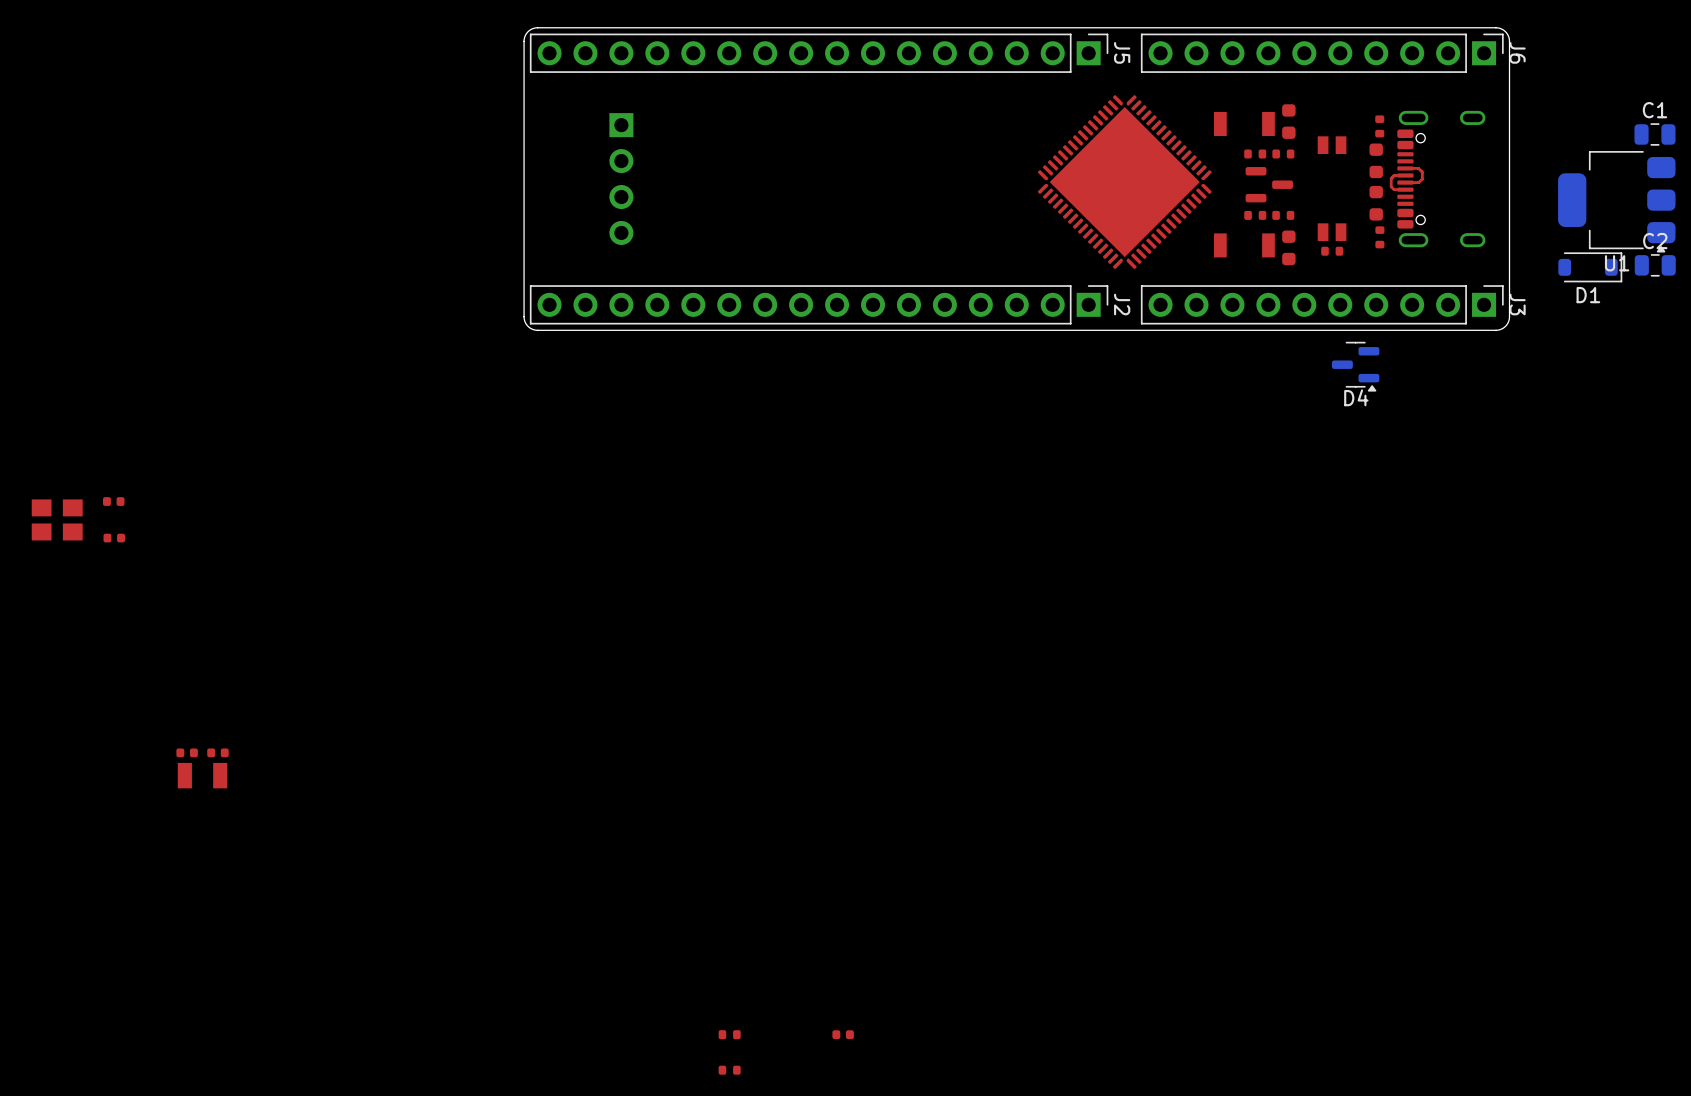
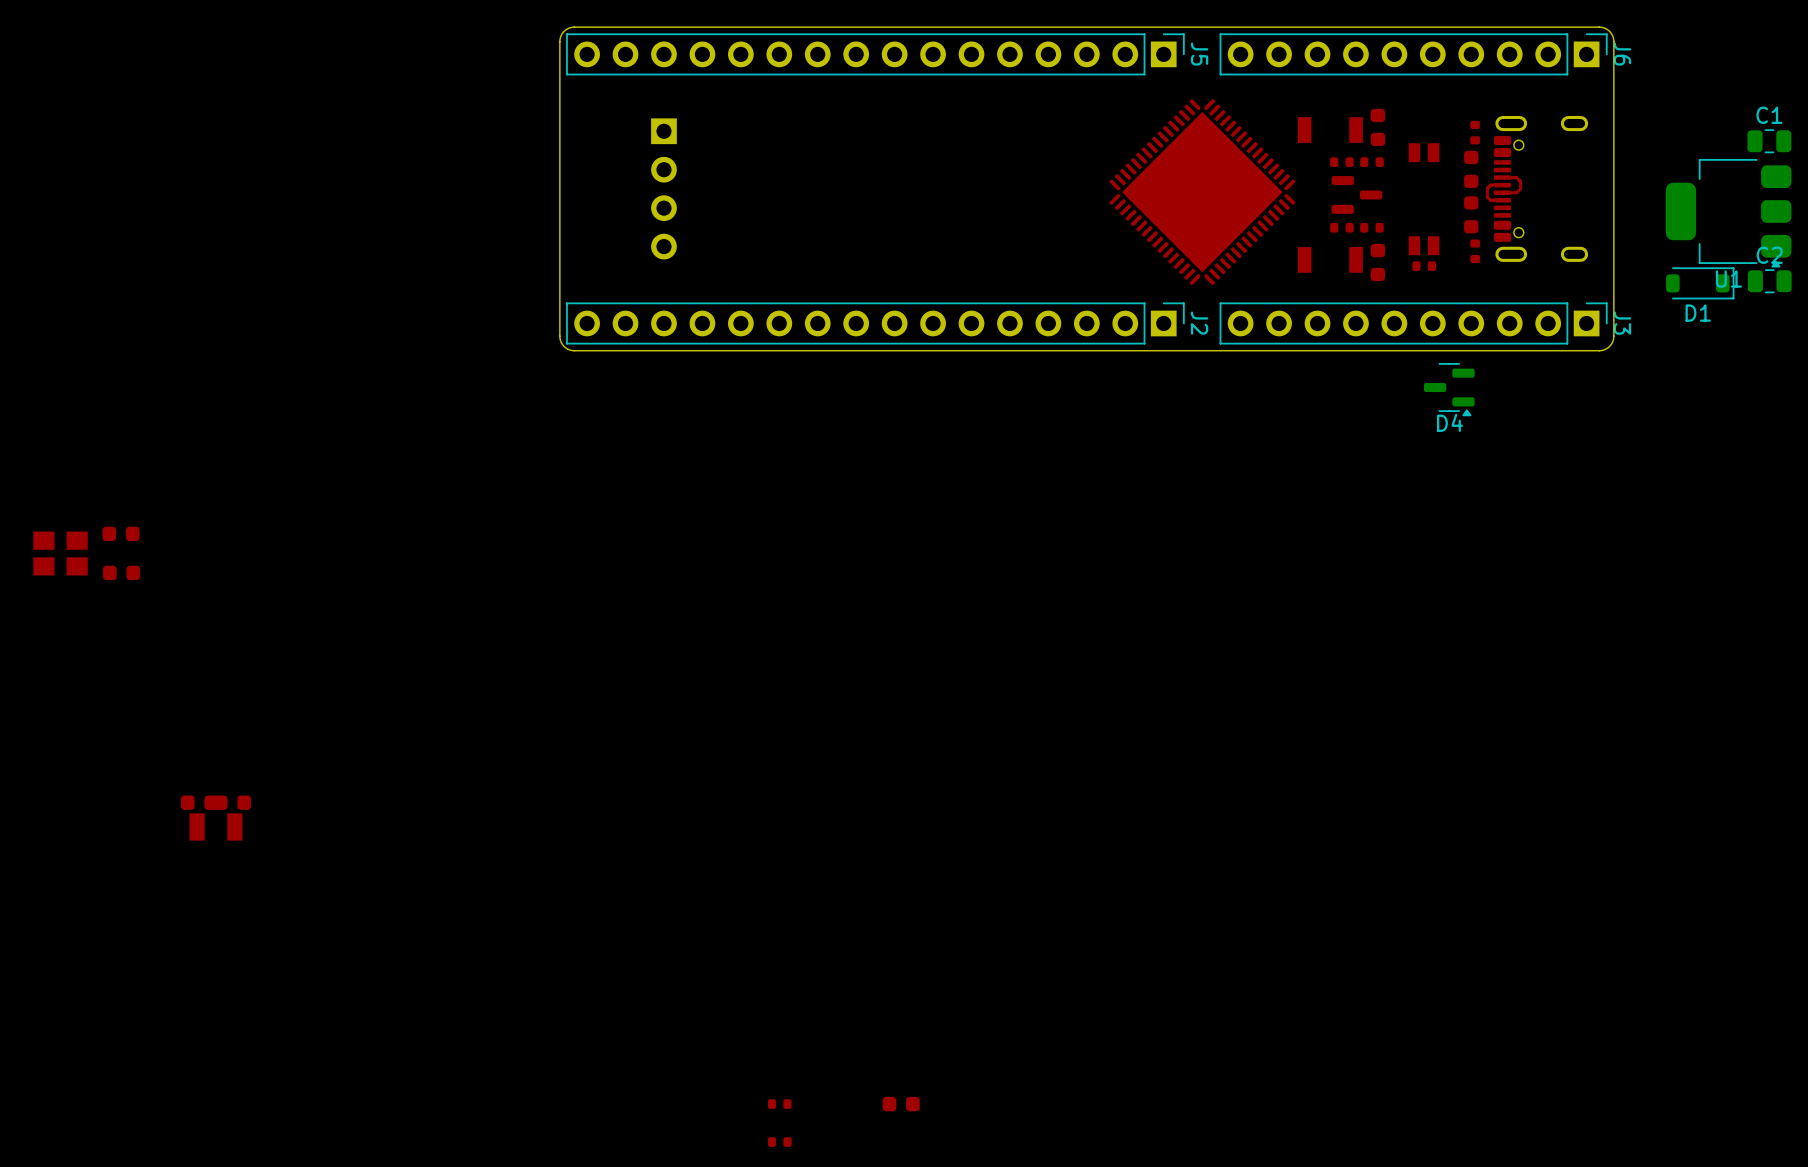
part footprint: [102, 497, 125, 506] -> [102, 526, 140, 542]
part footprint: [103, 533, 126, 543] -> [103, 565, 141, 581]
part footprint: [176, 748, 198, 758] -> [180, 795, 219, 810]
part footprint: [207, 748, 229, 758] -> [213, 795, 252, 810]
part footprint: [832, 1030, 854, 1040] -> [882, 1096, 920, 1112]

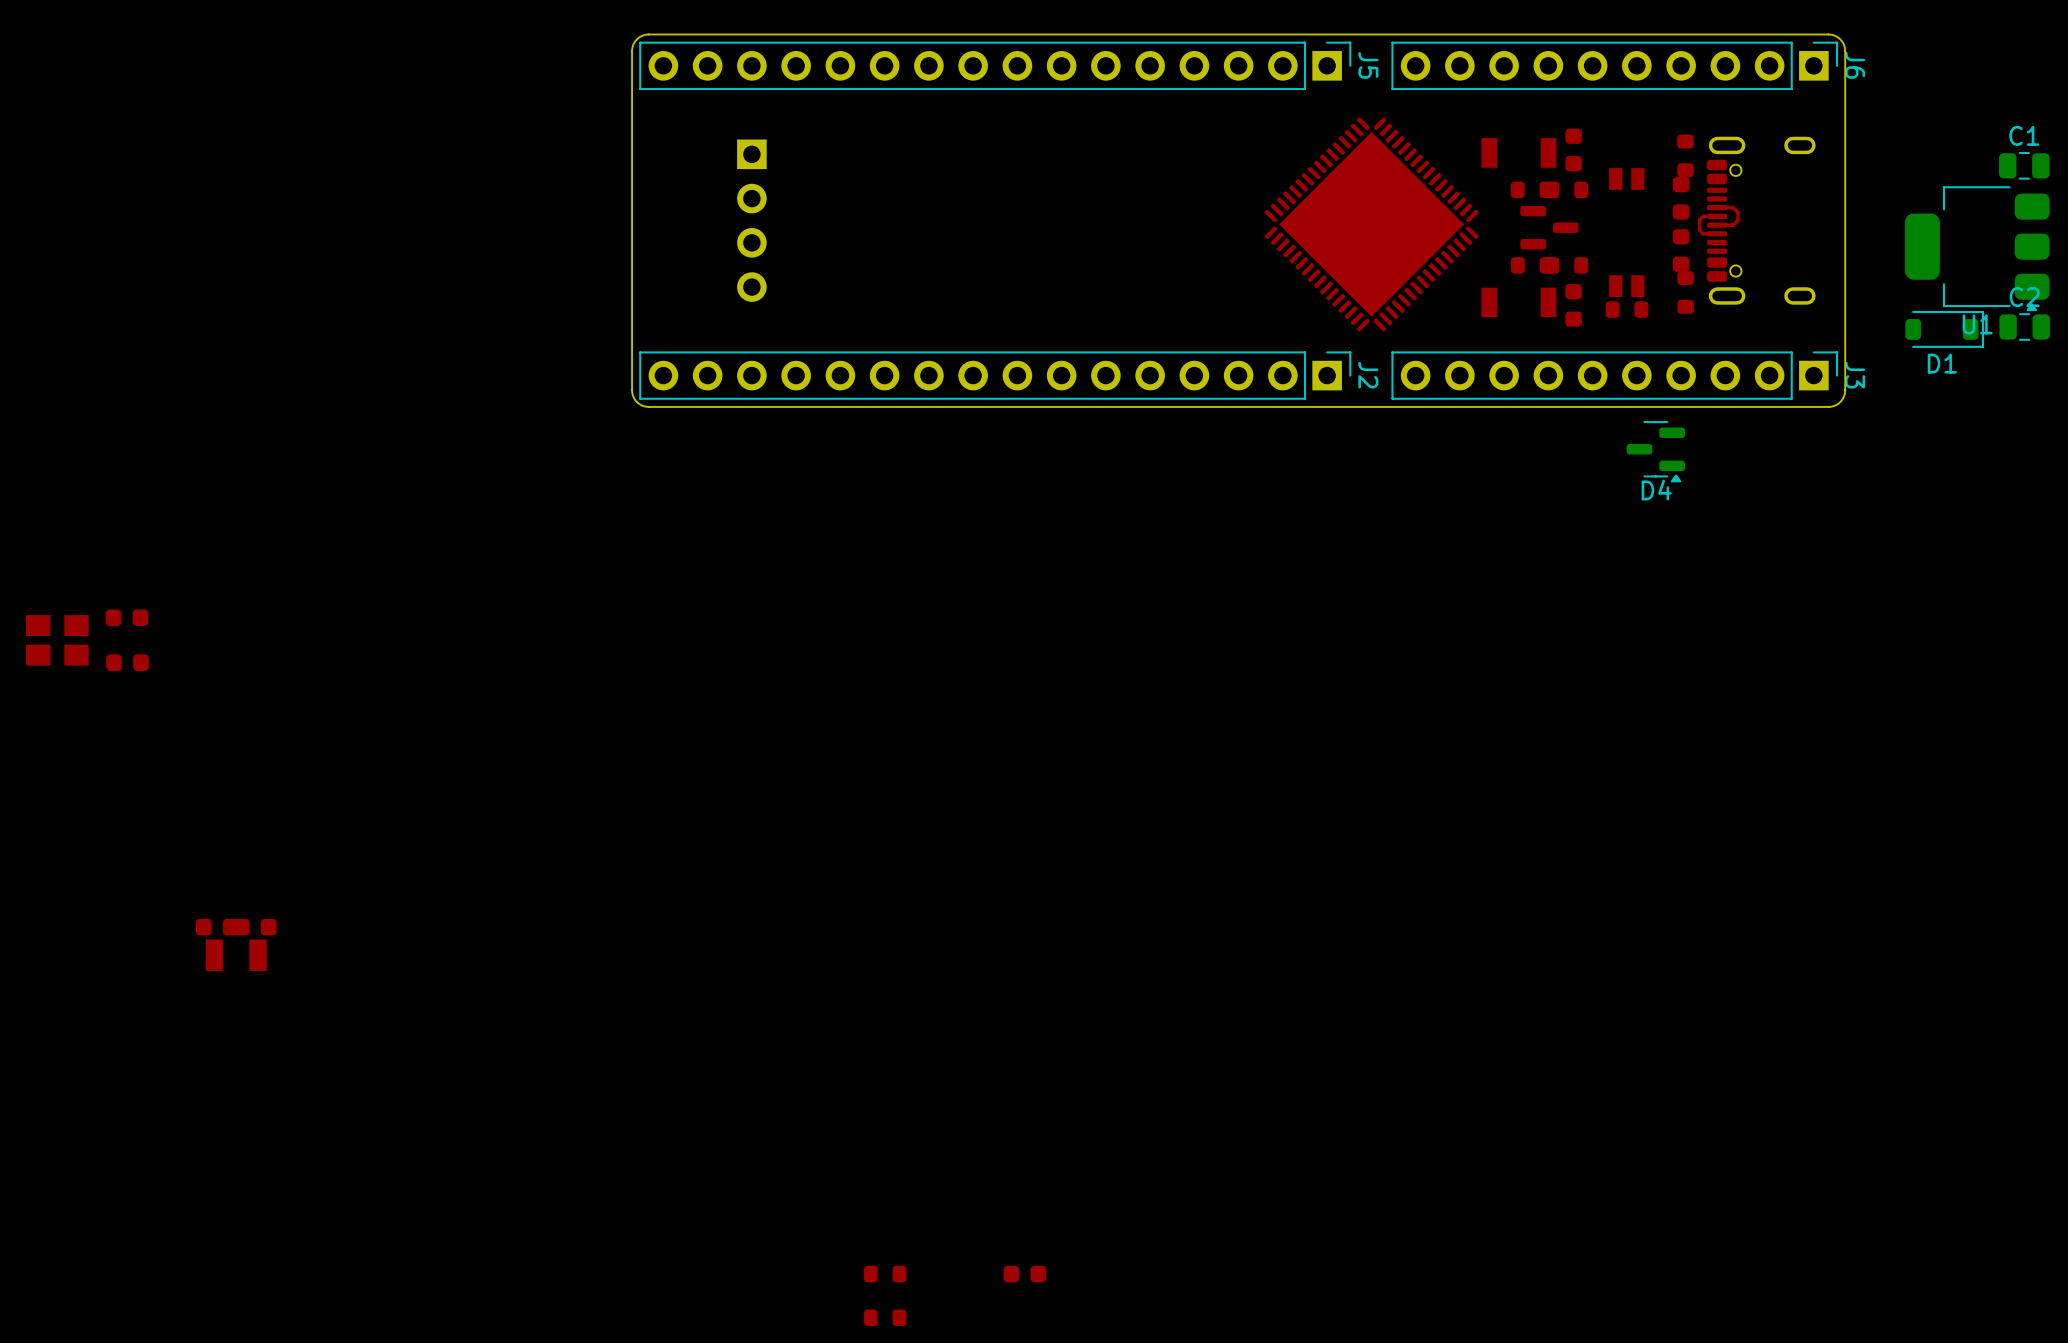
part footprint: [1470, 120, 1480, 145] -> [1677, 134, 1694, 178]
part footprint: [1330, 157, 1354, 167] -> [1510, 181, 1554, 199]
part footprint: [1360, 157, 1384, 167] -> [1545, 181, 1589, 199]
part footprint: [1330, 222, 1354, 233] -> [1510, 257, 1554, 274]
part footprint: [1360, 222, 1384, 233] -> [1545, 257, 1589, 274]
part footprint: [1470, 239, 1481, 264] -> [1677, 271, 1694, 314]
part footprint: [1412, 261, 1437, 271] -> [1605, 301, 1649, 318]
part footprint: [767, 1099, 792, 1109] -> [863, 1265, 907, 1283]
part footprint: [767, 1137, 792, 1147] -> [863, 1309, 907, 1327]

